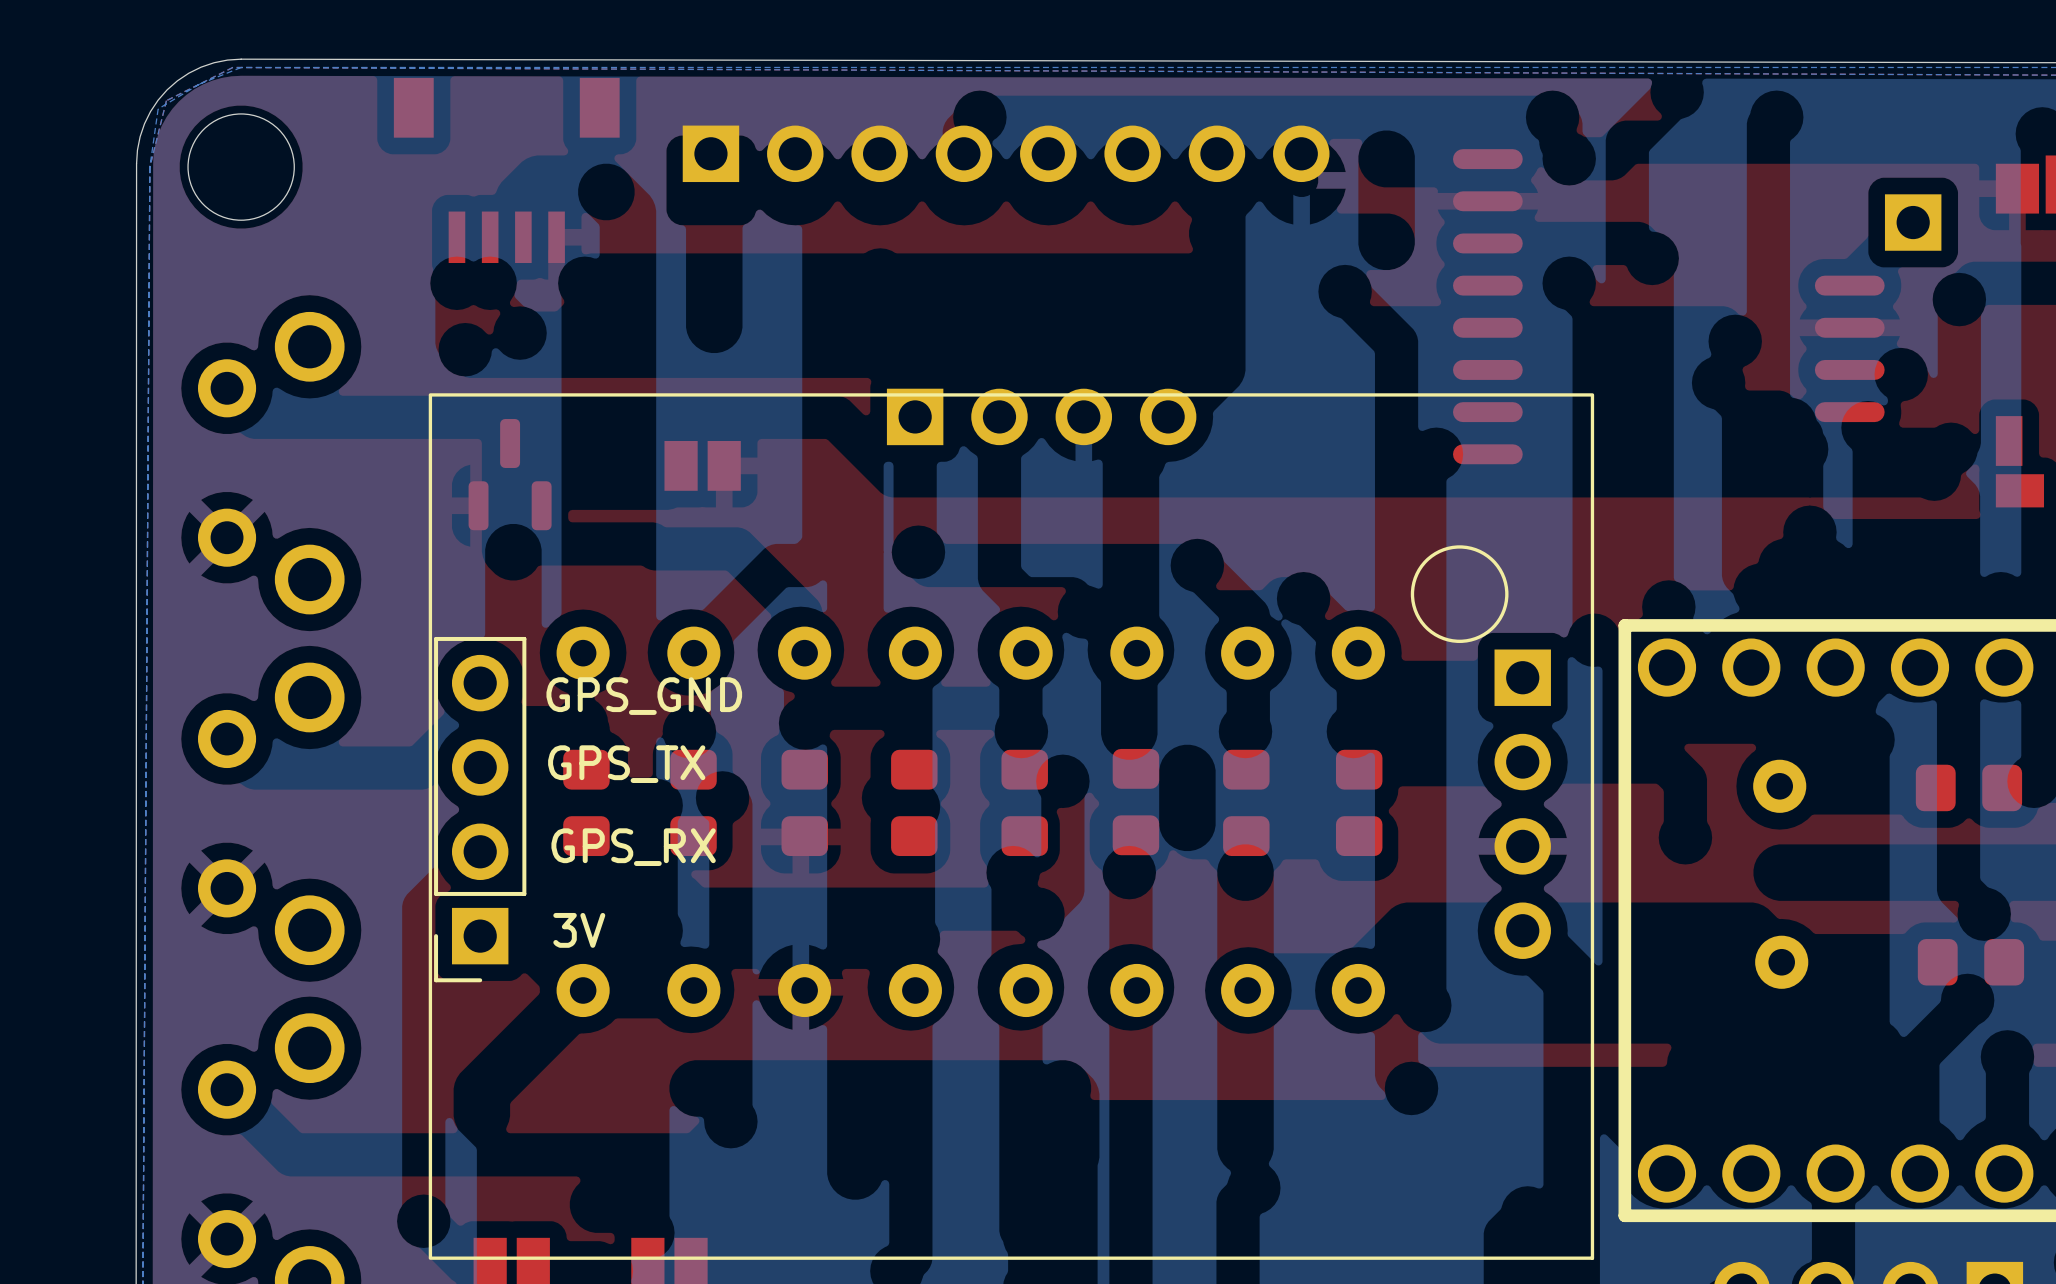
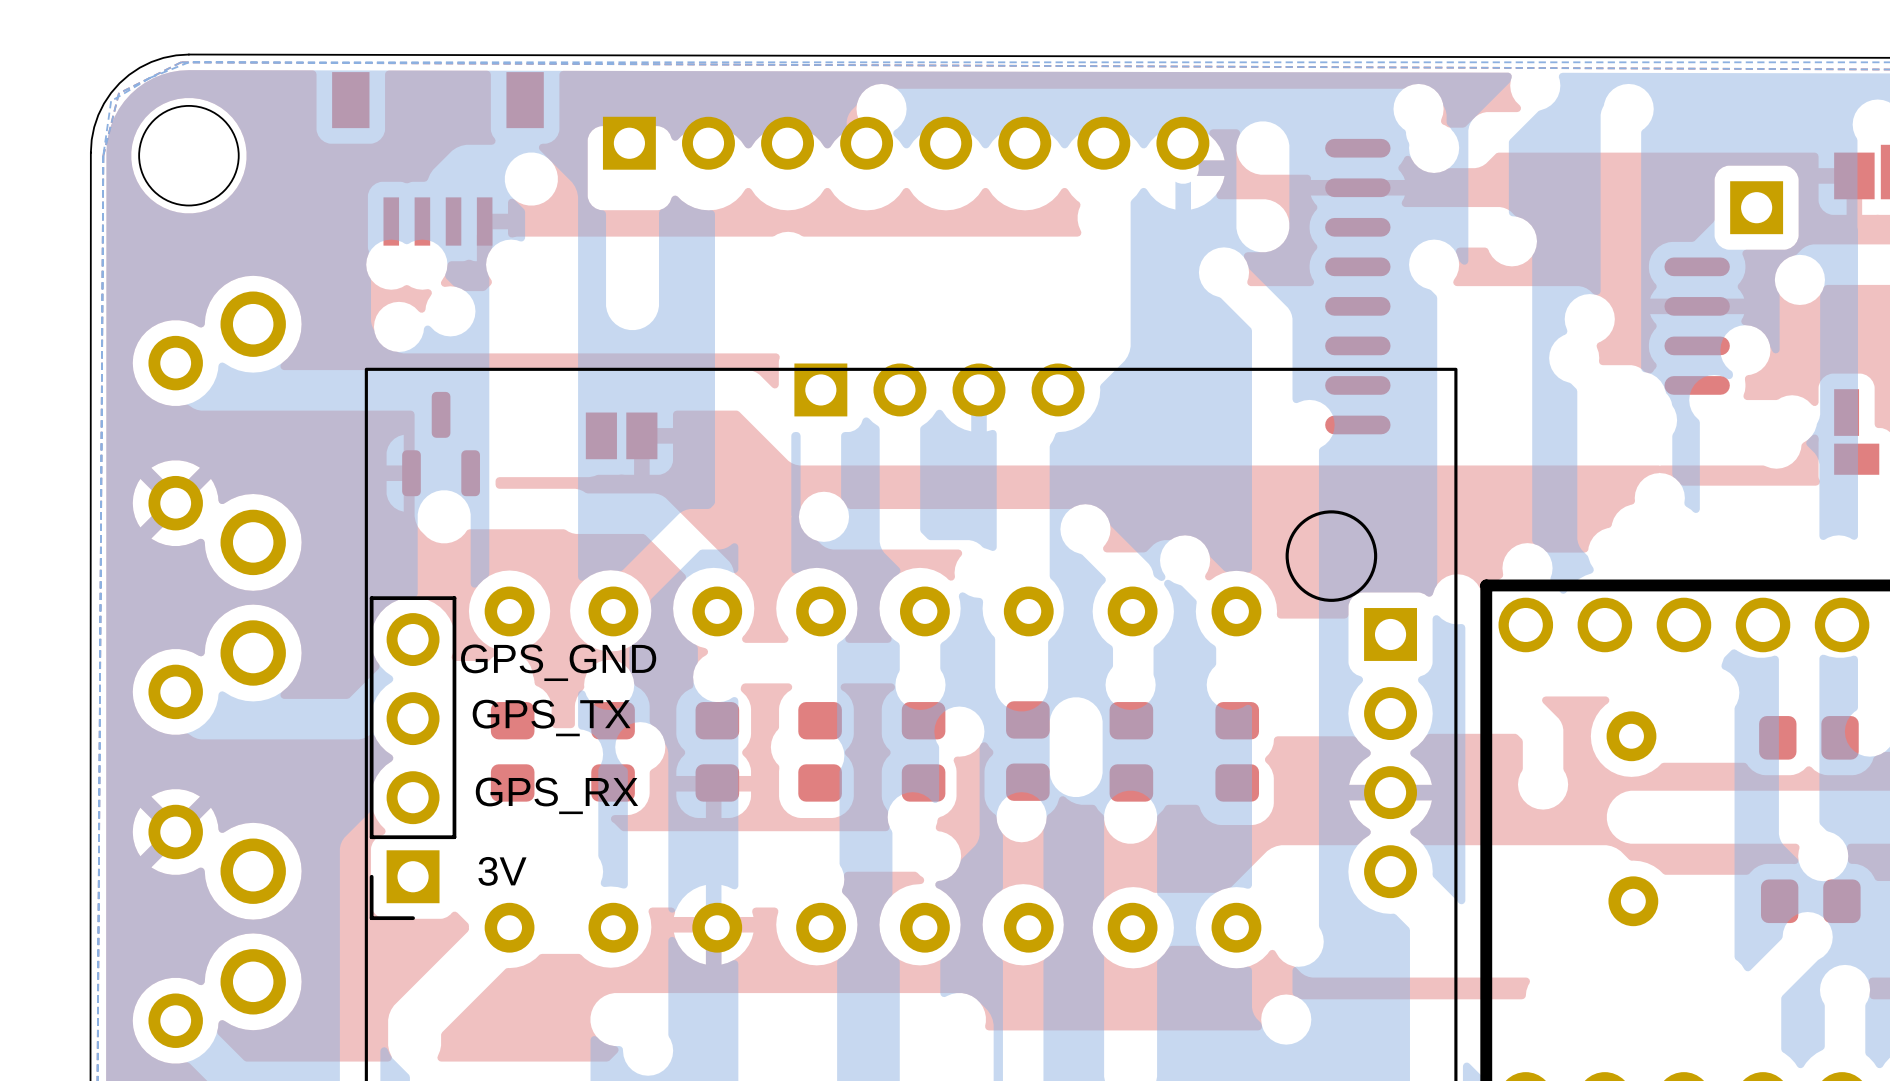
text position: GPS_GND (644, 696) -> GPS_GND (558, 662)

